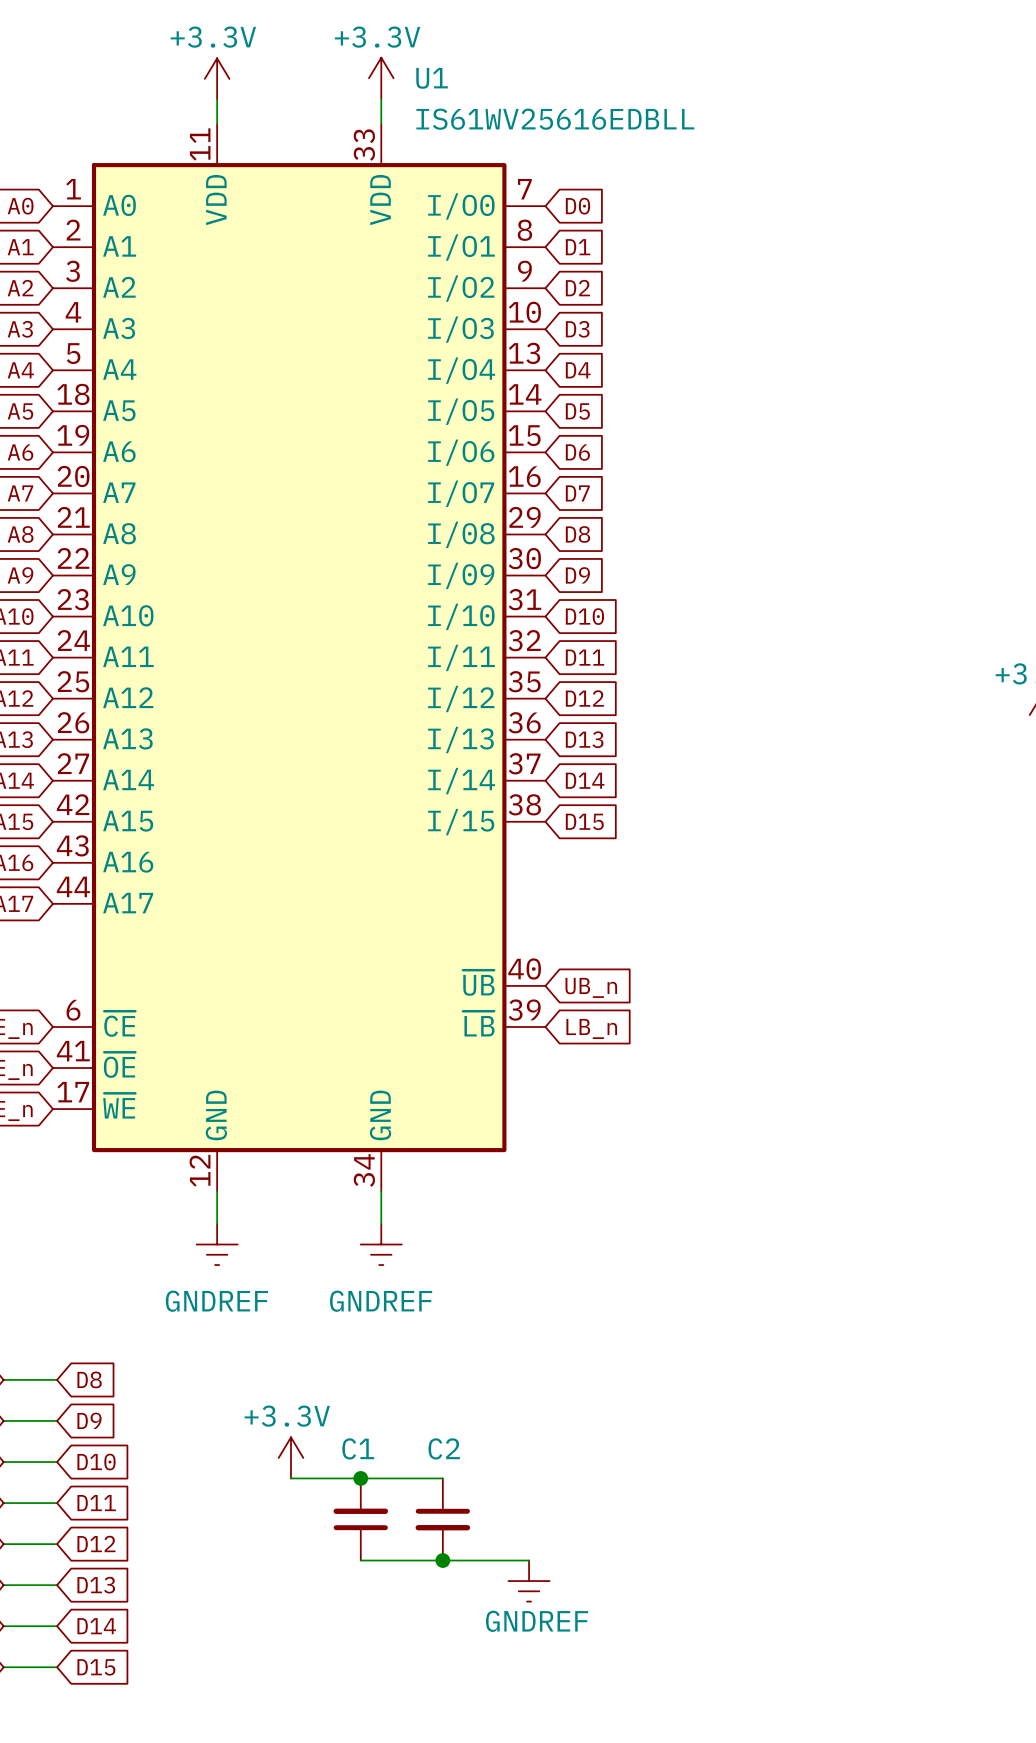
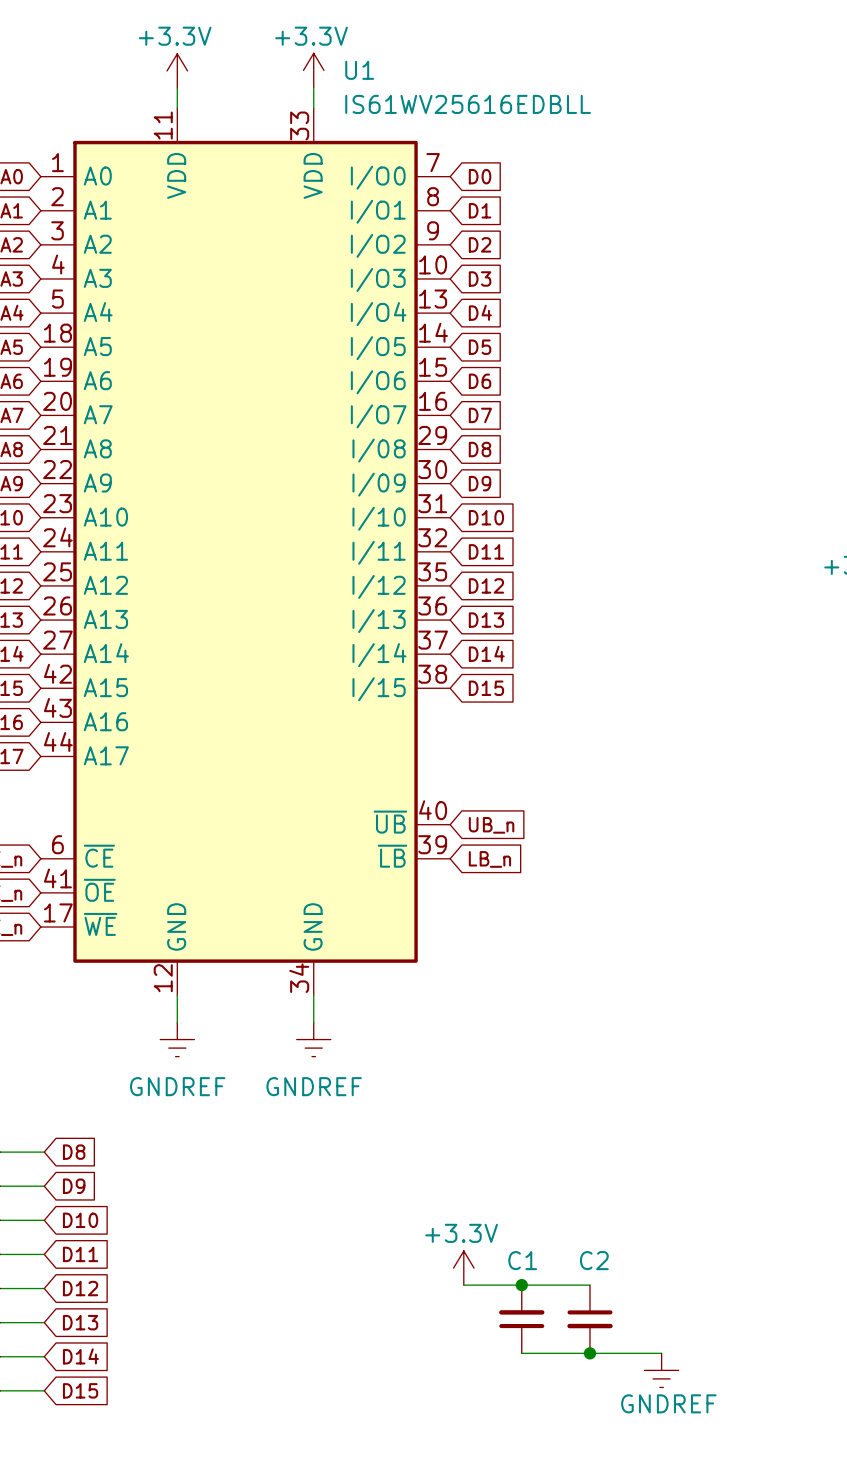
power symbol position: +3.3V (291, 1457) -> +3.3V (463, 1268)
wire: (291, 1478) (442, 1478) -> (463, 1285) (589, 1285)
junction: (360, 1478) -> none
C1 position: (360, 1519) -> (521, 1319)
C2 position: (442, 1519) -> (589, 1319)
junction: none -> (521, 1285)
wire: (360, 1560) (529, 1560) -> (521, 1353) (661, 1353)
junction: (442, 1560) -> none
power symbol position: GNDREF (529, 1581) -> GNDREF (661, 1370)
junction: none -> (589, 1353)

